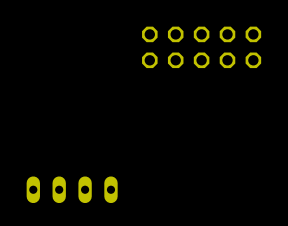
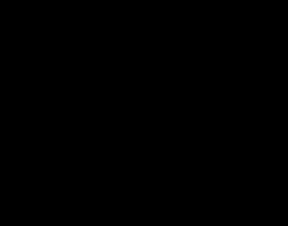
part: (201, 47) -> none
part: (72, 189) -> none

